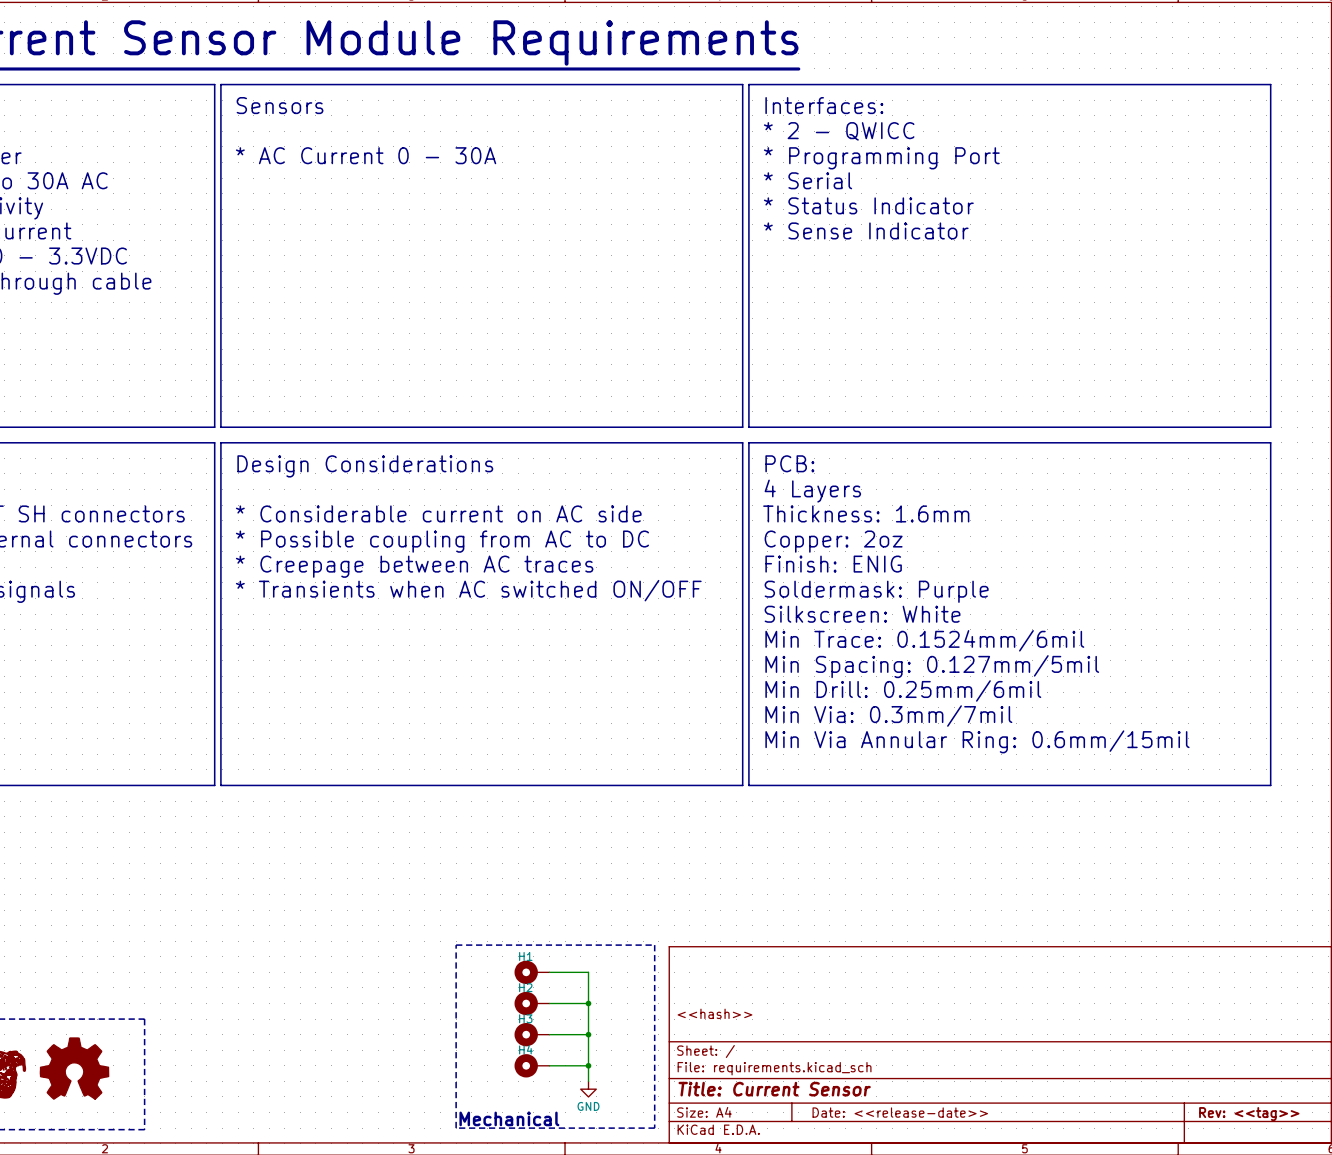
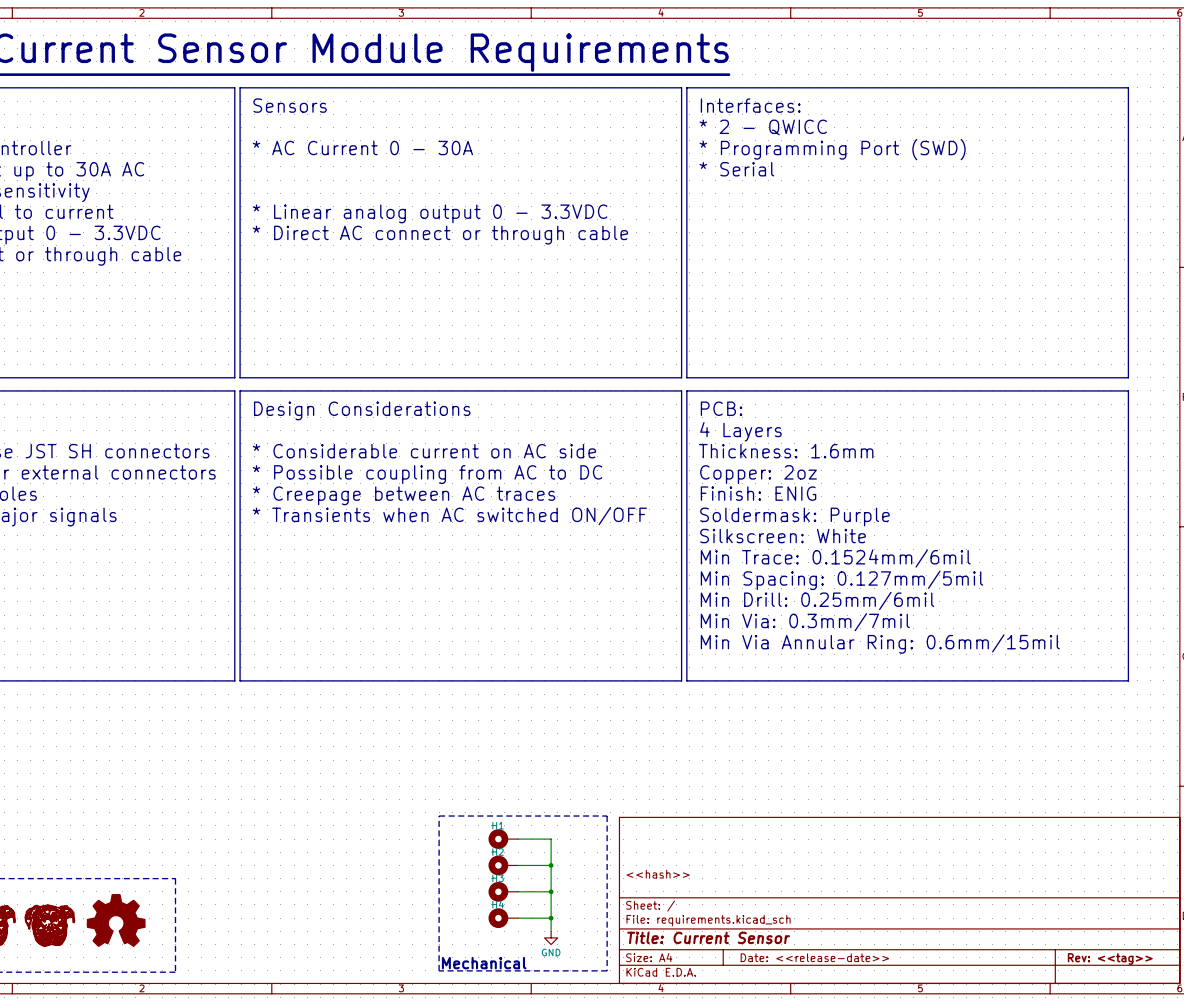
text: * Programming Port (881, 158) -> * Programming Port (SWD) (832, 149)
text: * Status Indicator (868, 205) -> none
text: * Sense Indicator (866, 230) -> none
text: none -> * Linear analog output 0 - 3.3VDC (430, 213)
text: none -> * Direct AC connect or through cable (440, 235)

